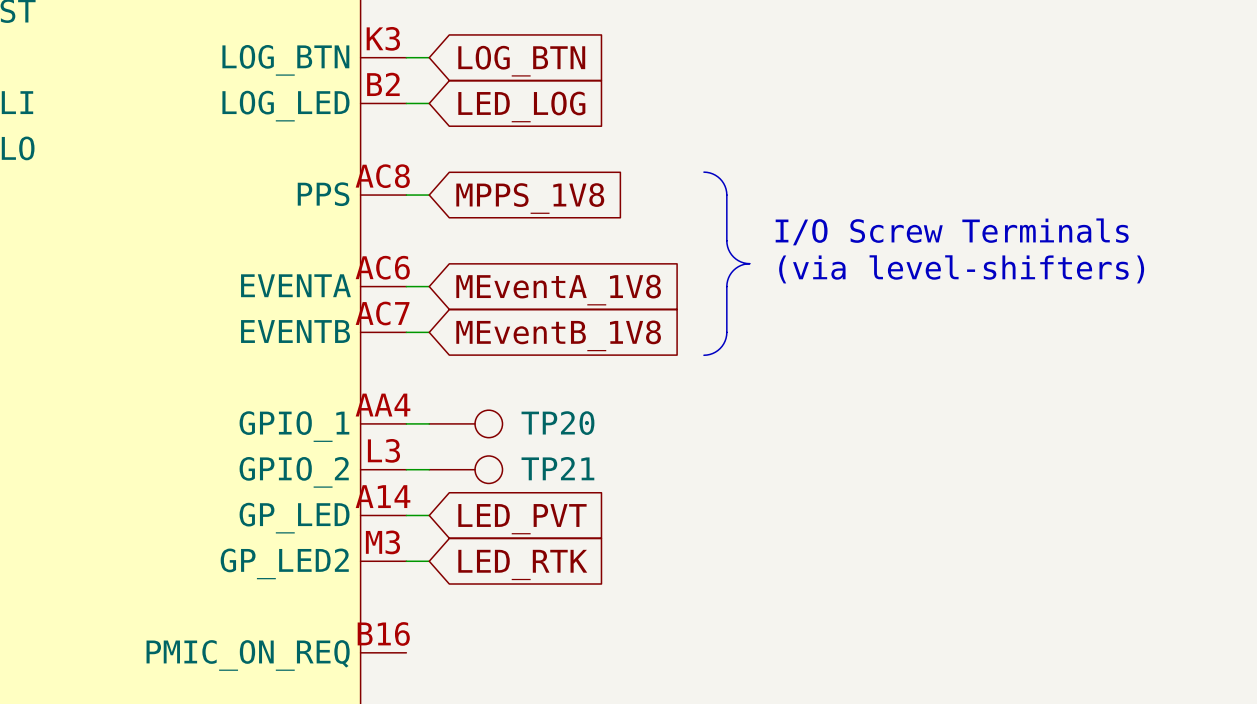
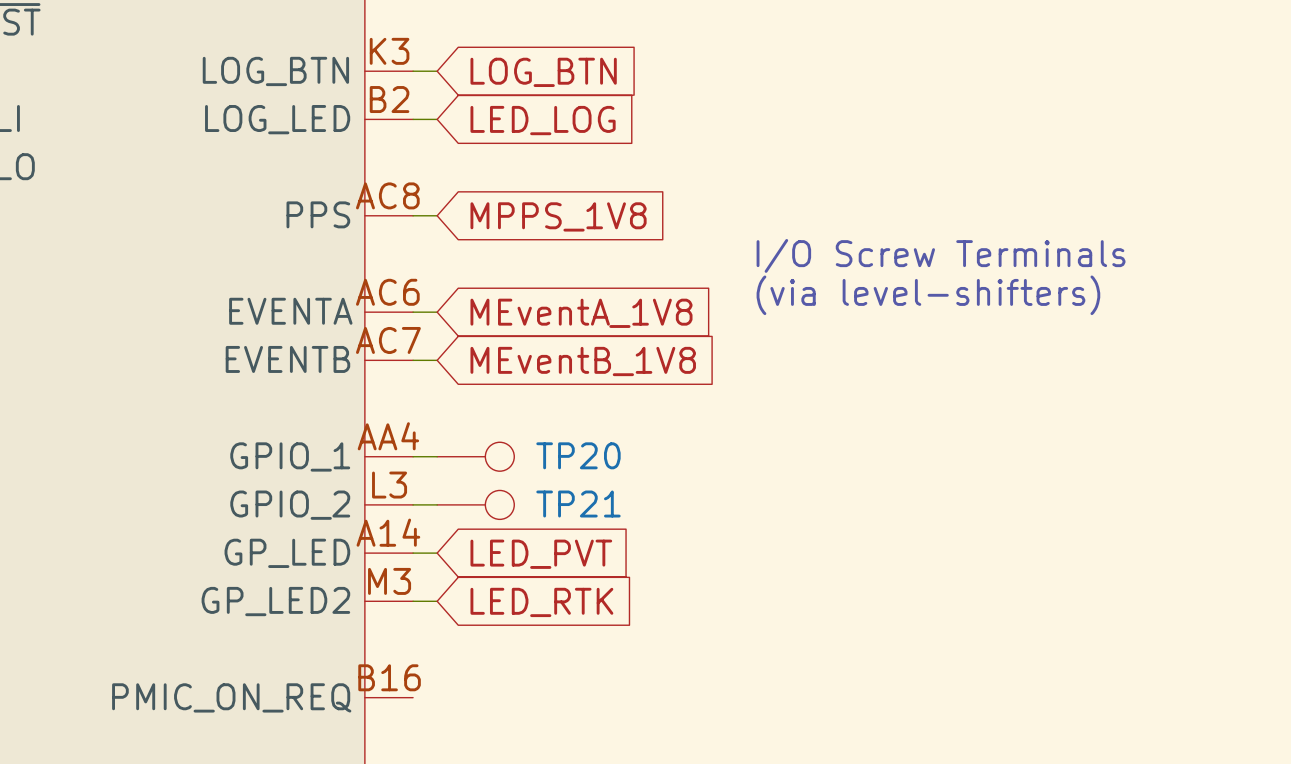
line: (703, 172) (717, 176) (726, 189) (726, 240) (729, 252) (738, 260) (749, 263) (738, 266) (729, 275) (726, 286) (726, 338) (717, 350) (703, 355) -> none
text position: I/O Screw Terminals (952, 231) -> I/O Screw Terminals (941, 255)
text position: (via level-shifters) (961, 269) -> (via level-shifters) (928, 295)

